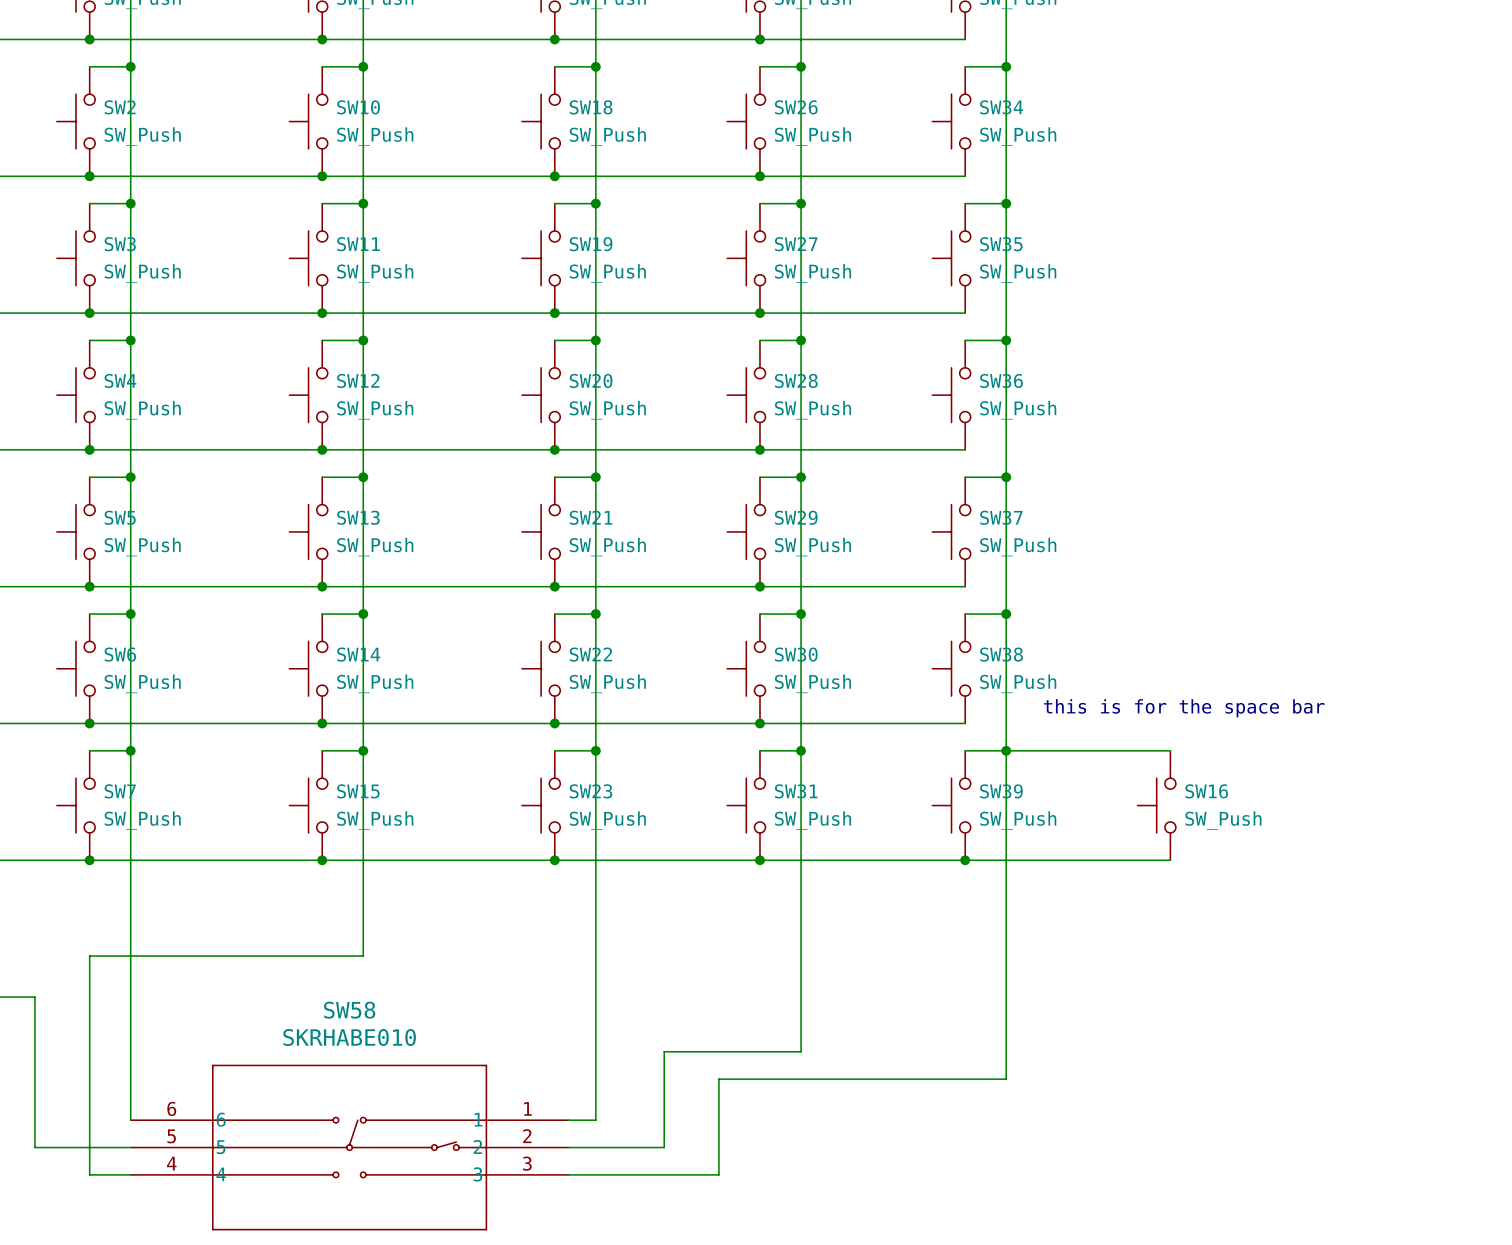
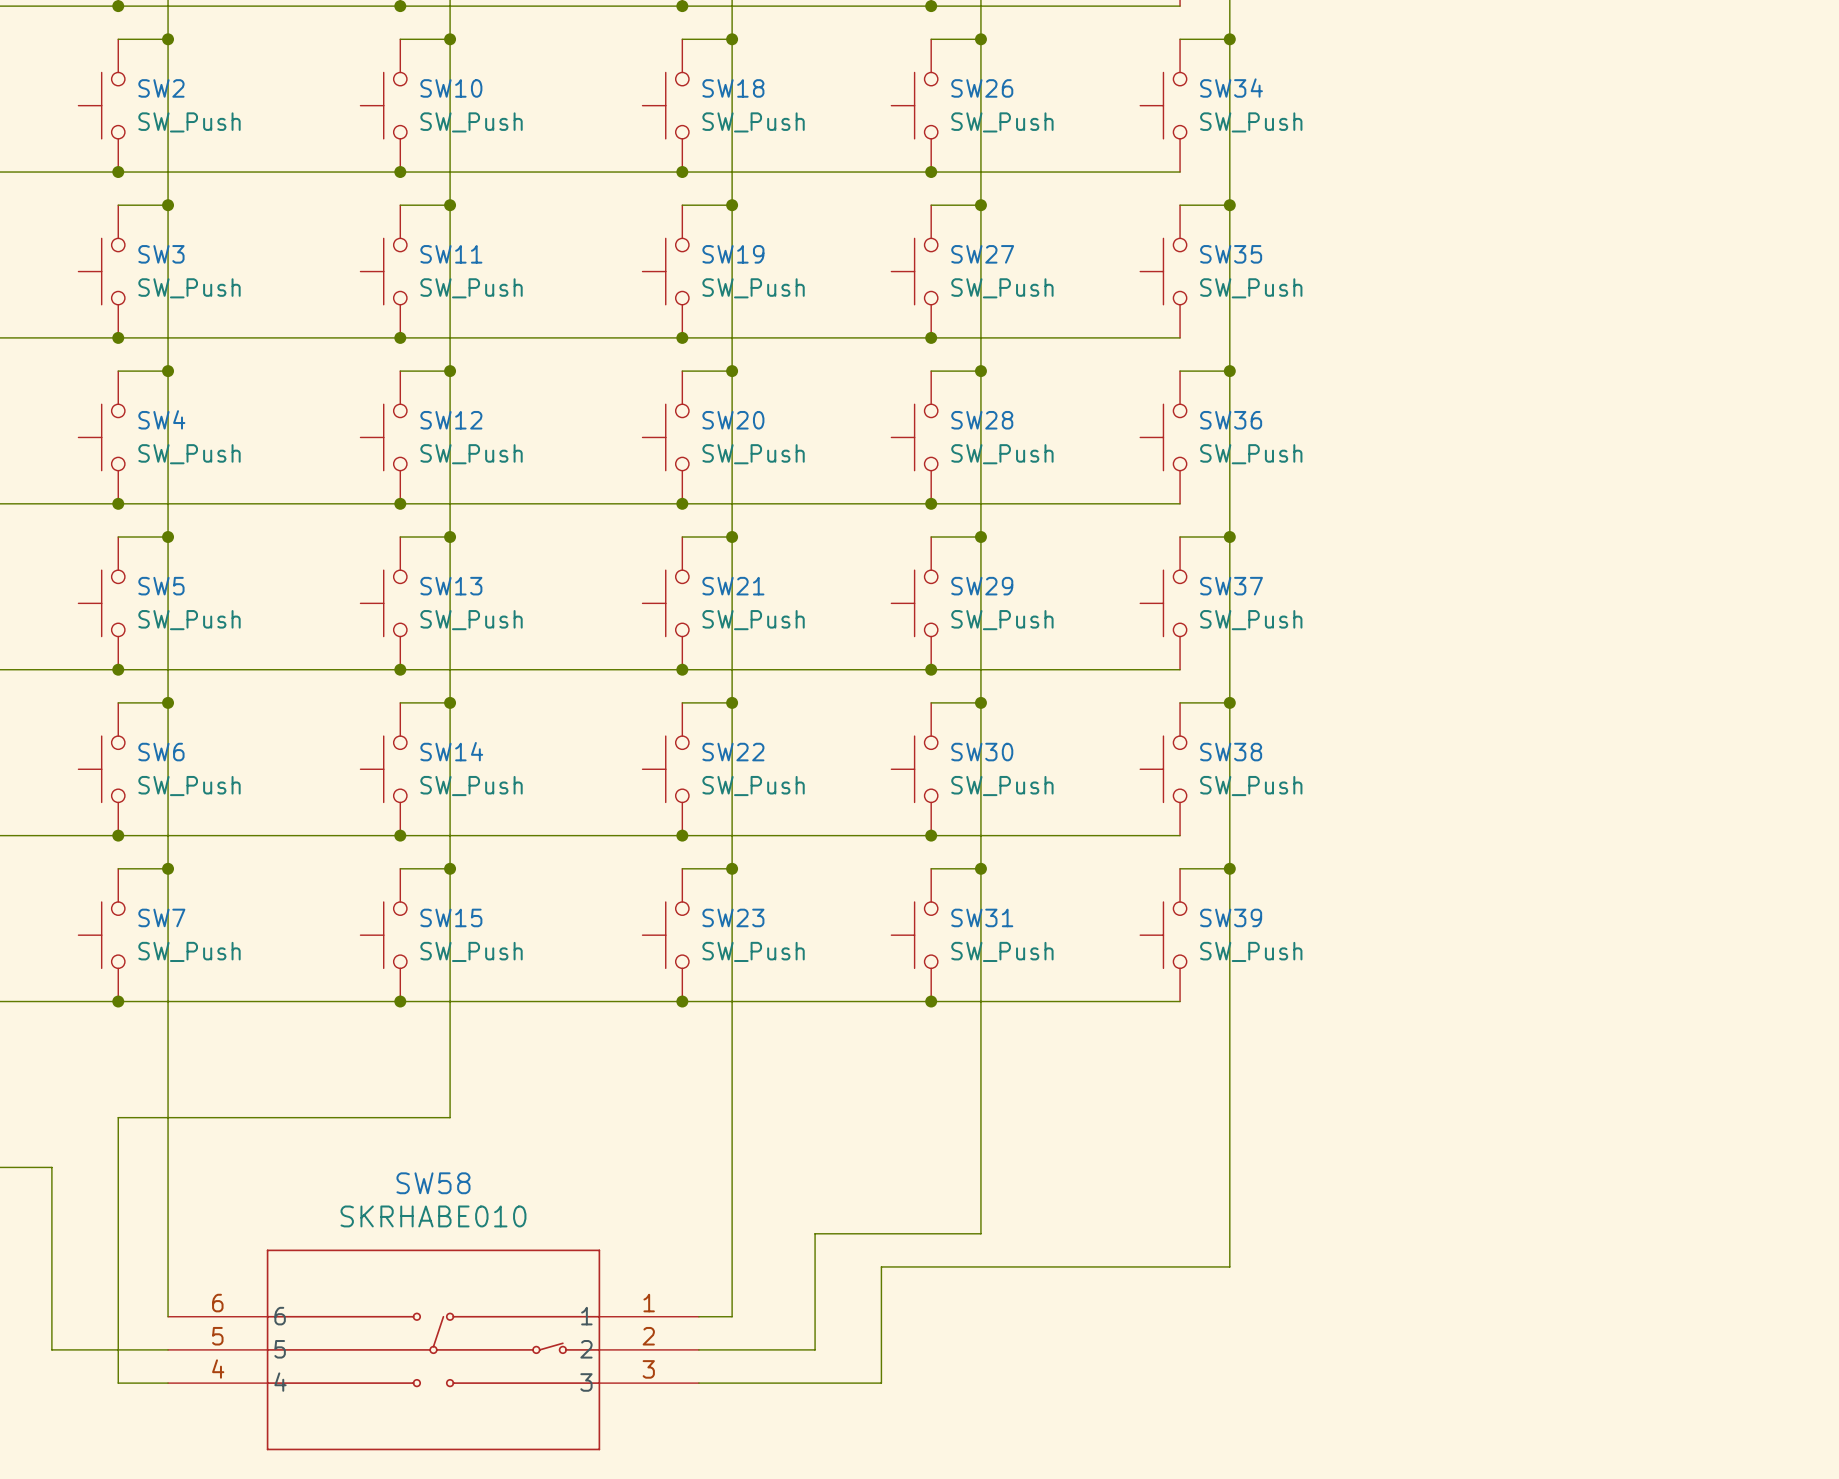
text: this is for the space bar (1184, 708) -> none
wire: (1006, 750) (1170, 750) -> none
SW16: SW_Push (1156, 805) -> none
wire: (965, 860) (1170, 860) -> none
junction: (965, 860) -> none

